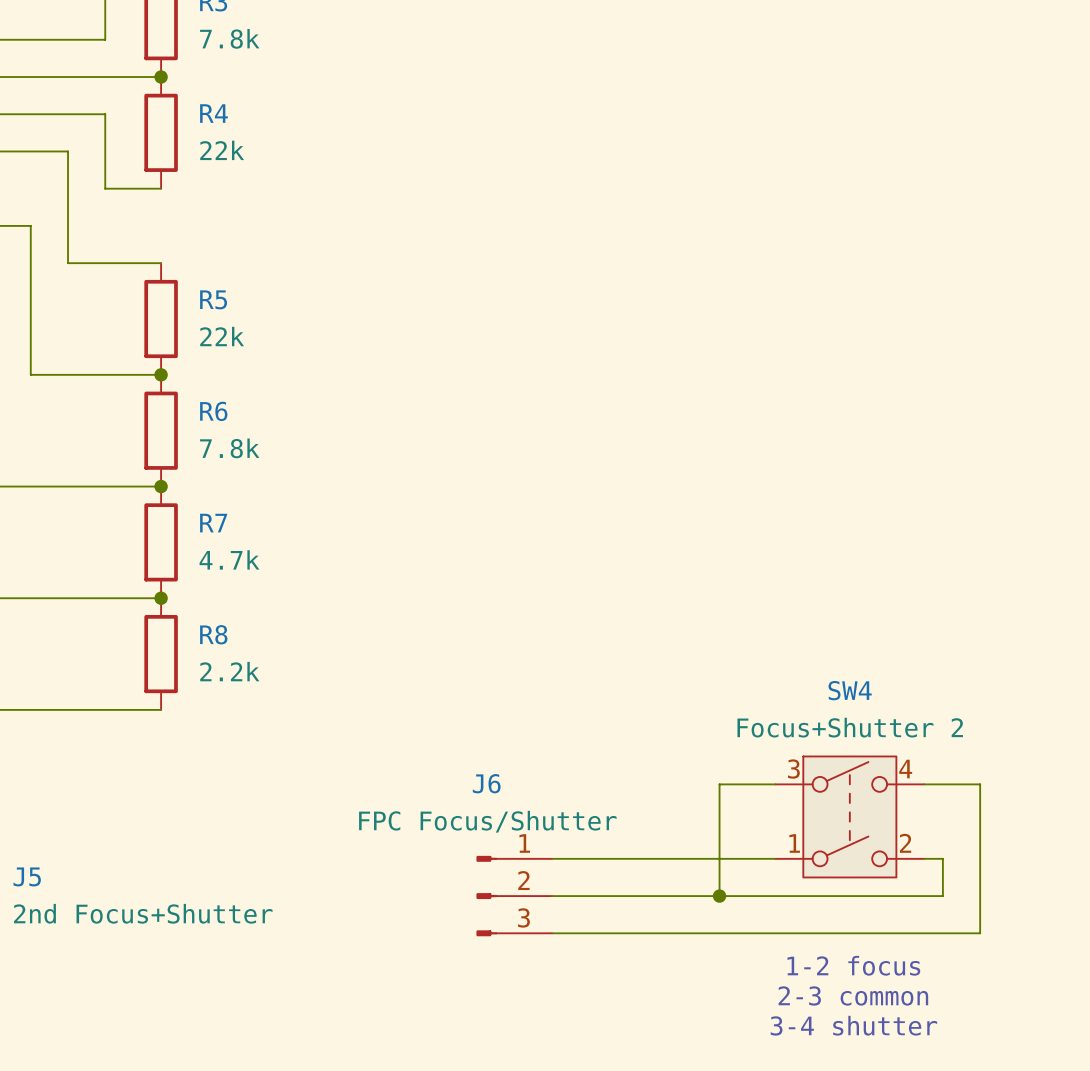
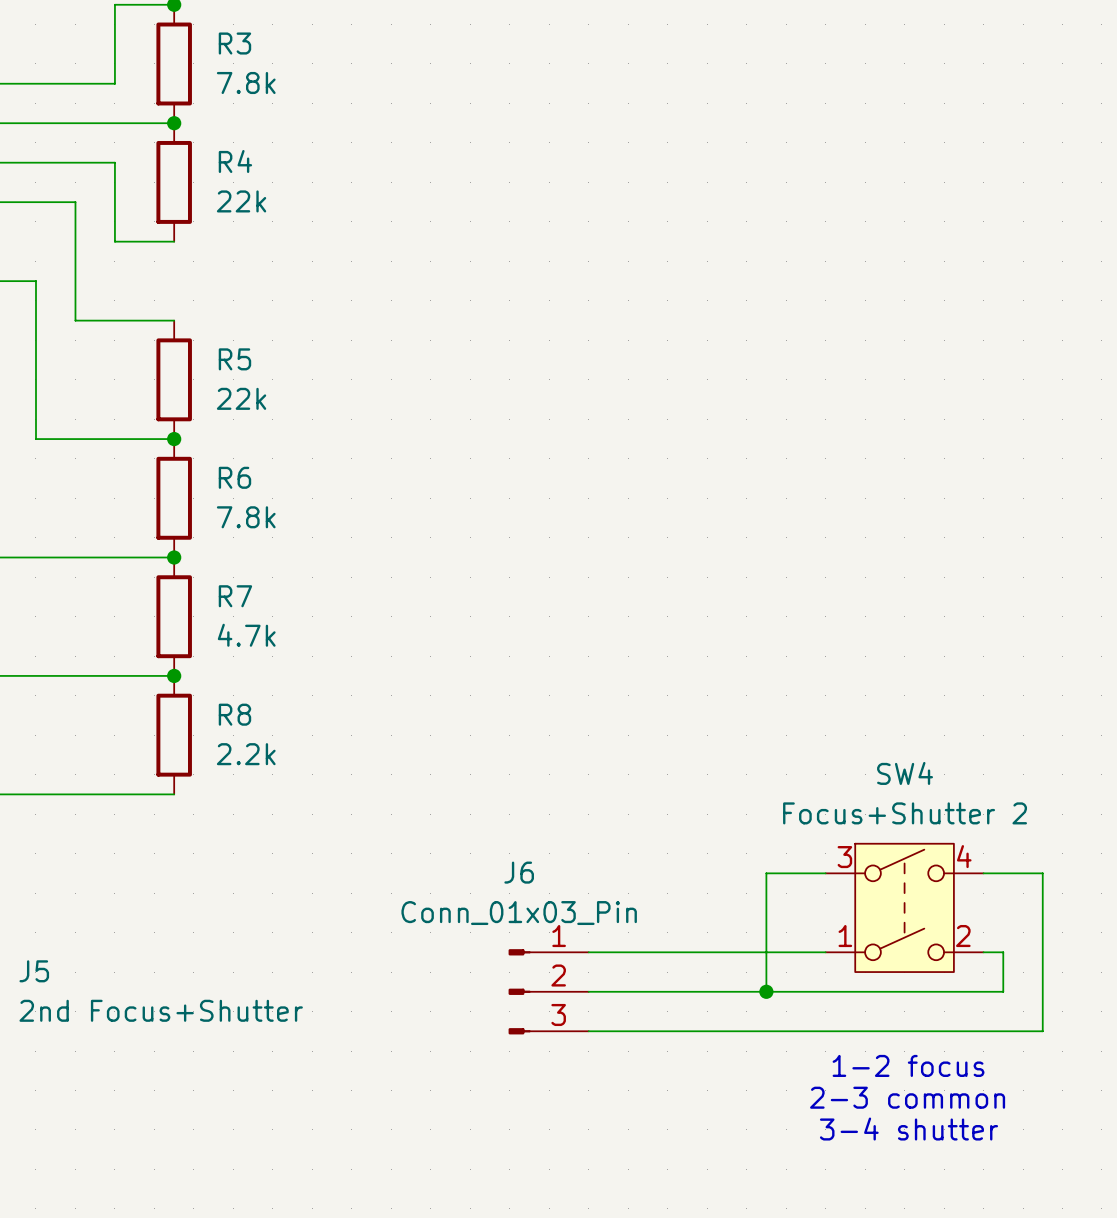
J6 value: FPC Focus/Shutter (487, 821) -> Conn_01x03_Pin (519, 913)

